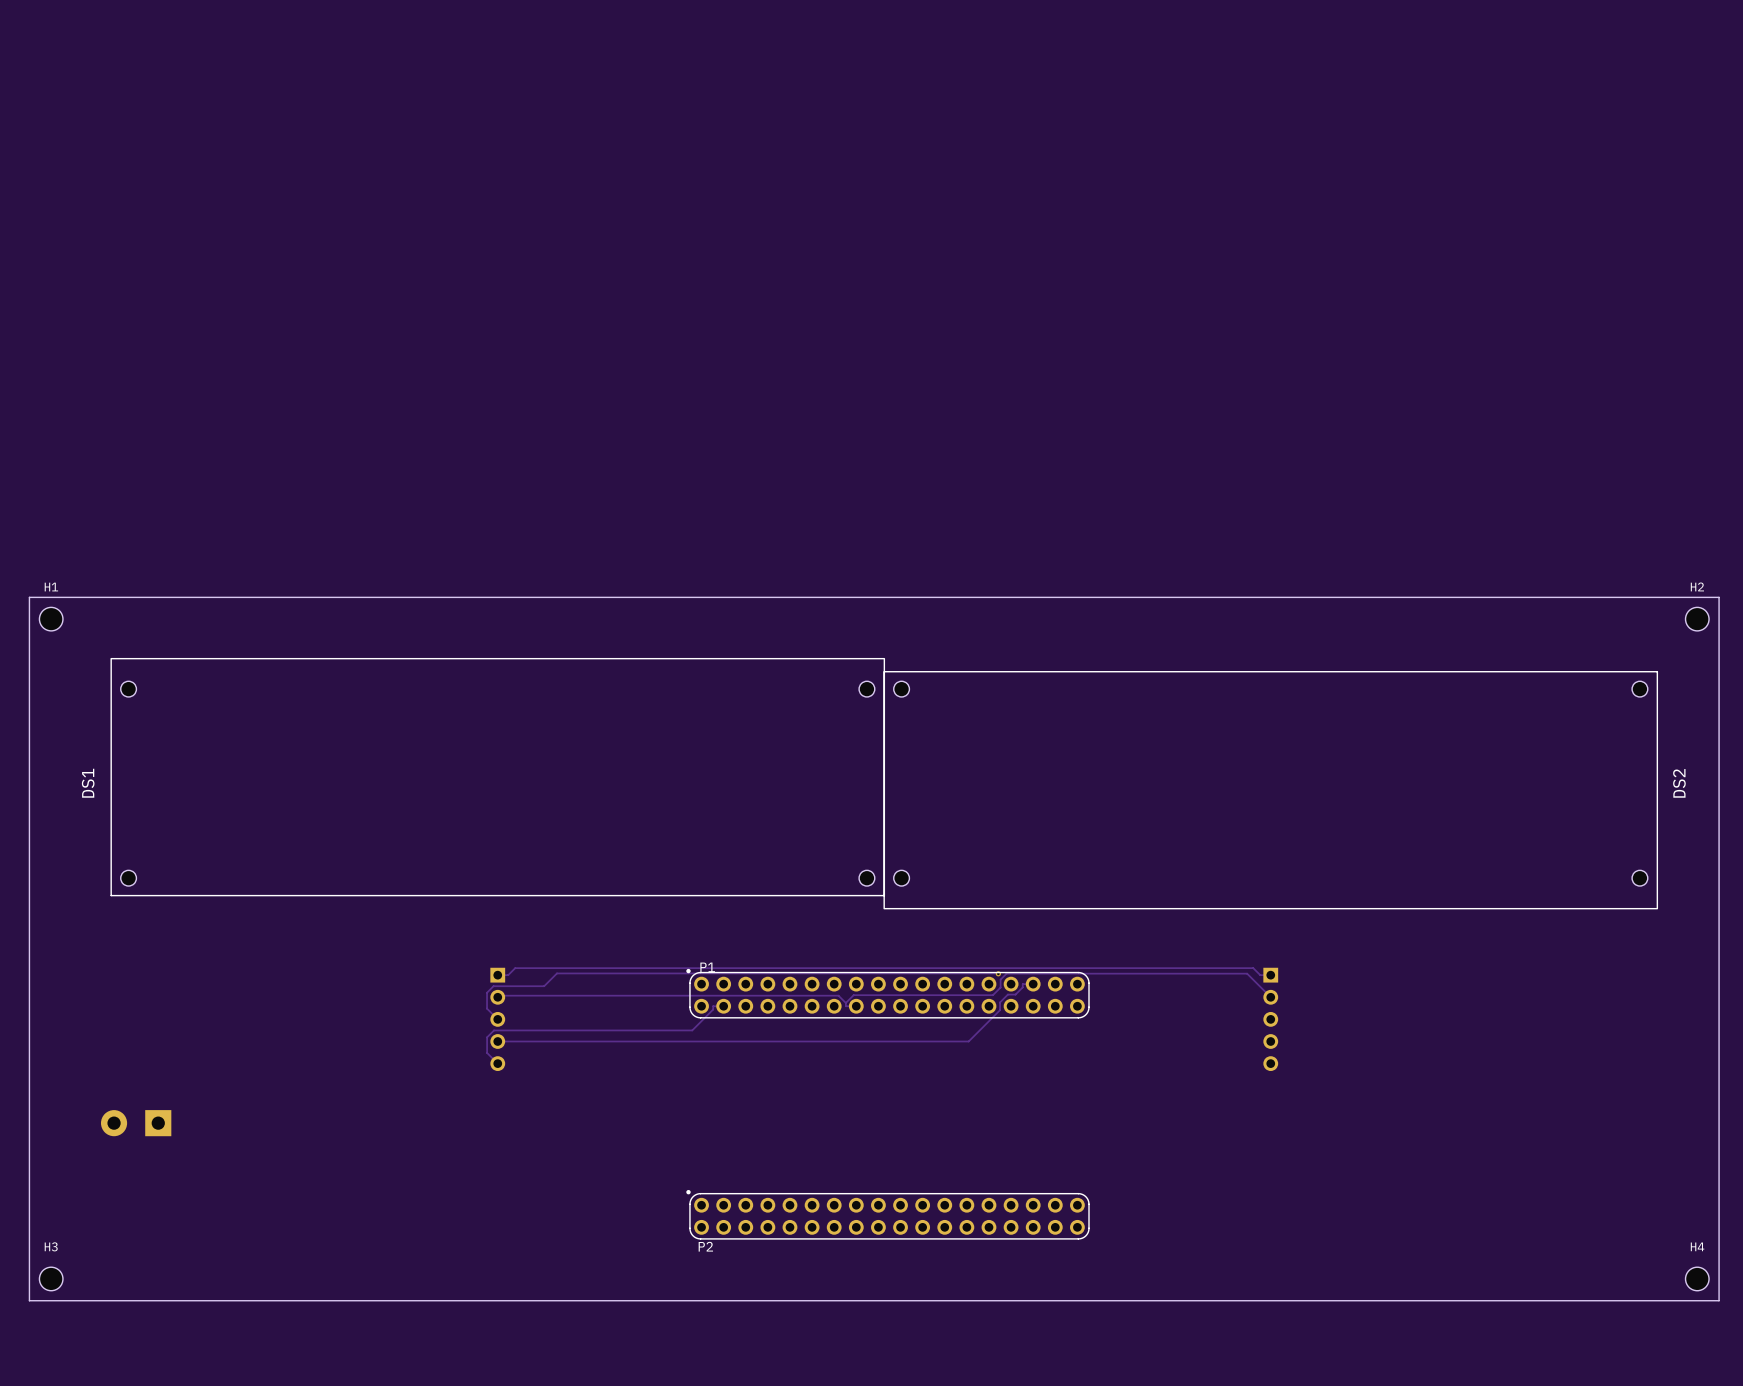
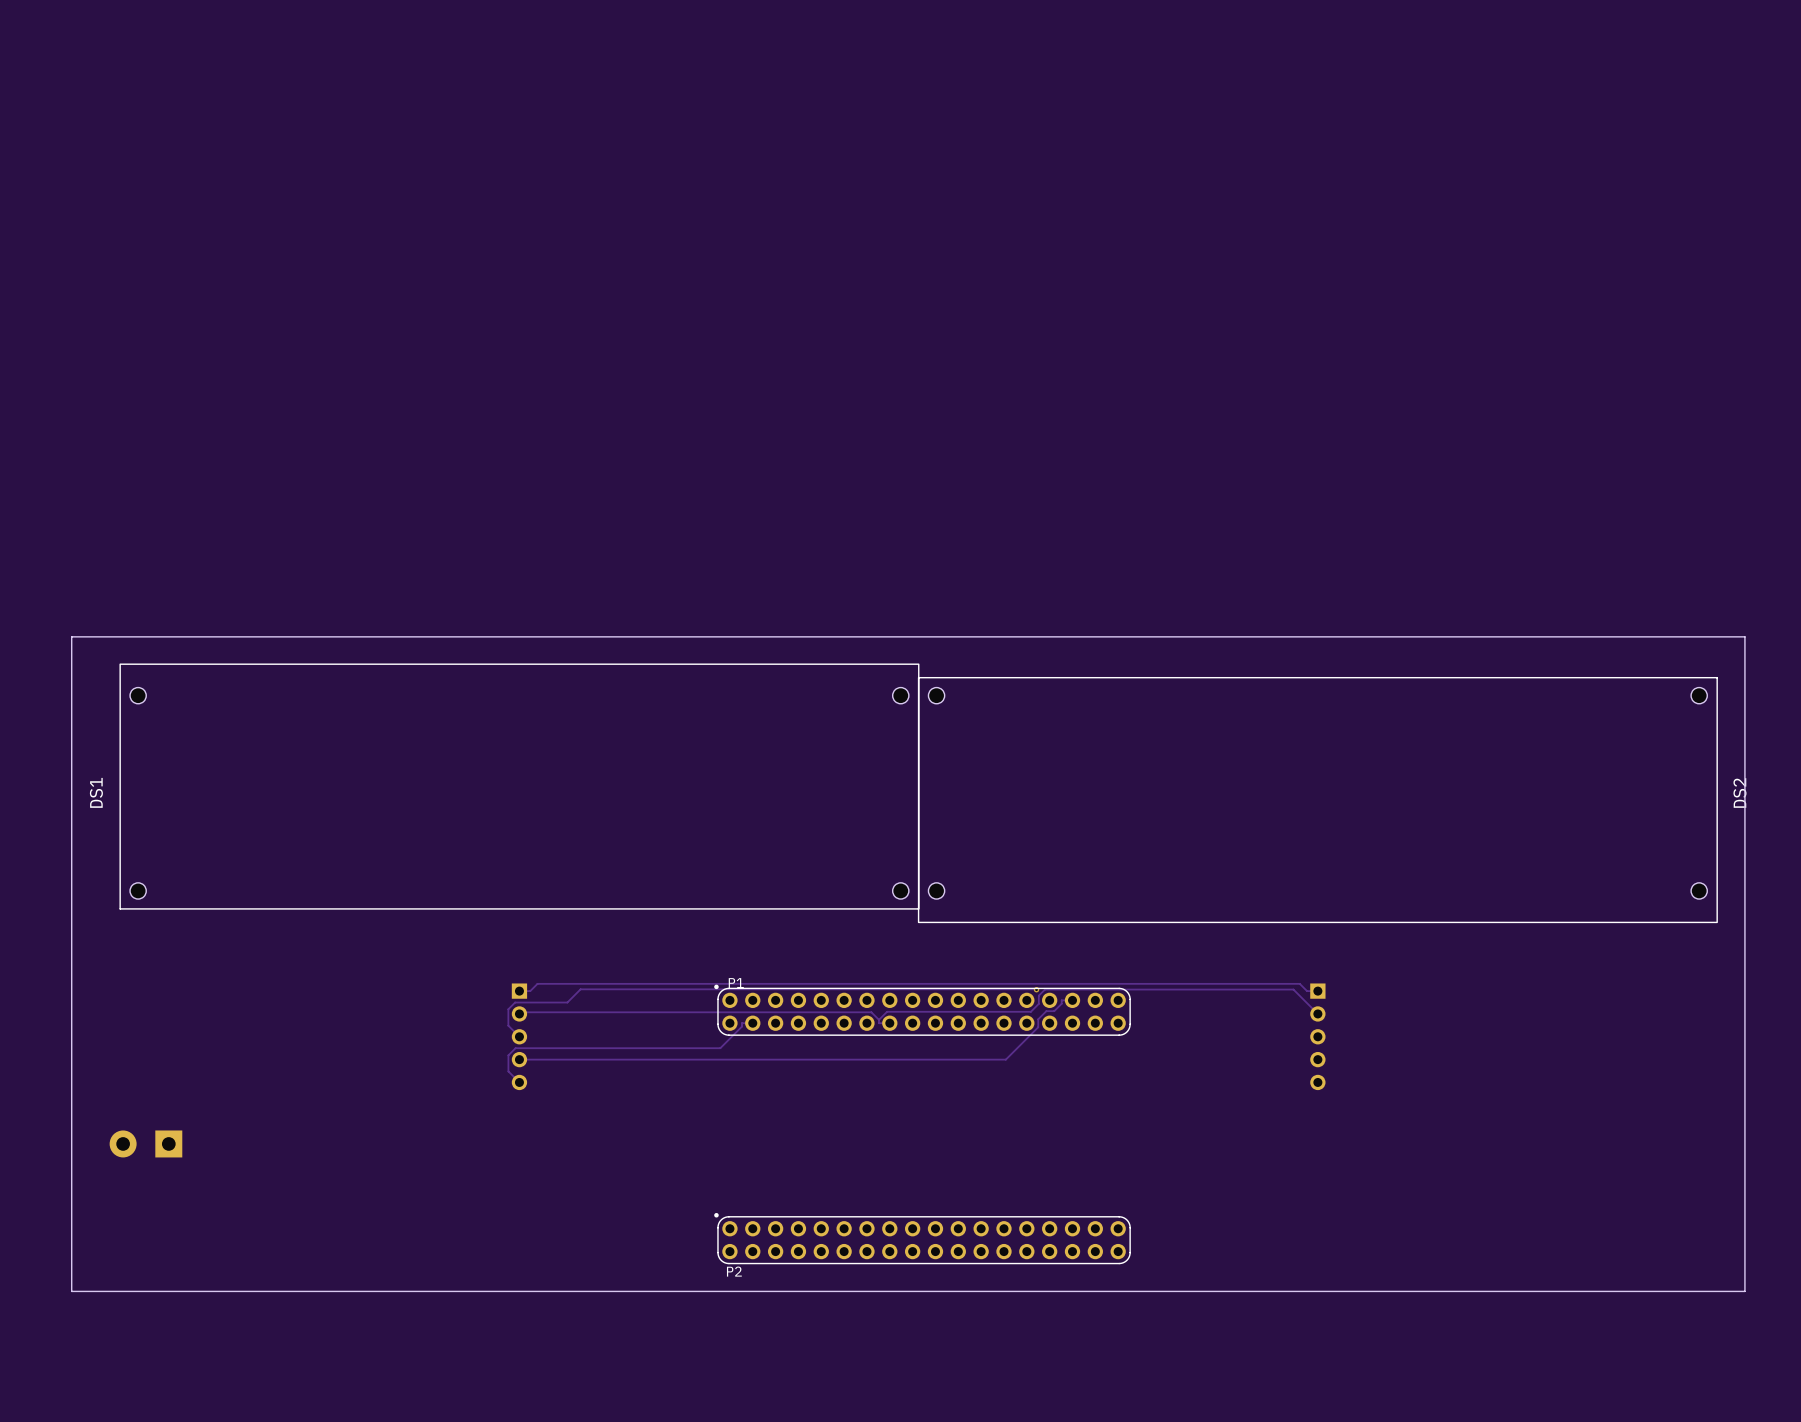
board edge: (29, 597) (29, 1300) (1719, 1300) (1719, 597) (29, 597) -> (71, 636) (71, 1291) (1744, 1291) (1744, 636) (71, 636)
H1: (51, 619) -> none
H2: (1697, 619) -> none
H3: (51, 1278) -> none
H4: (1697, 1278) -> none

